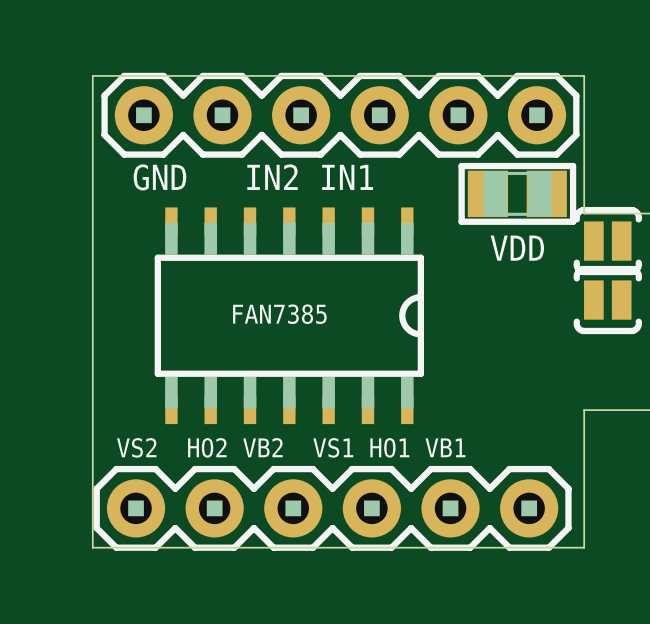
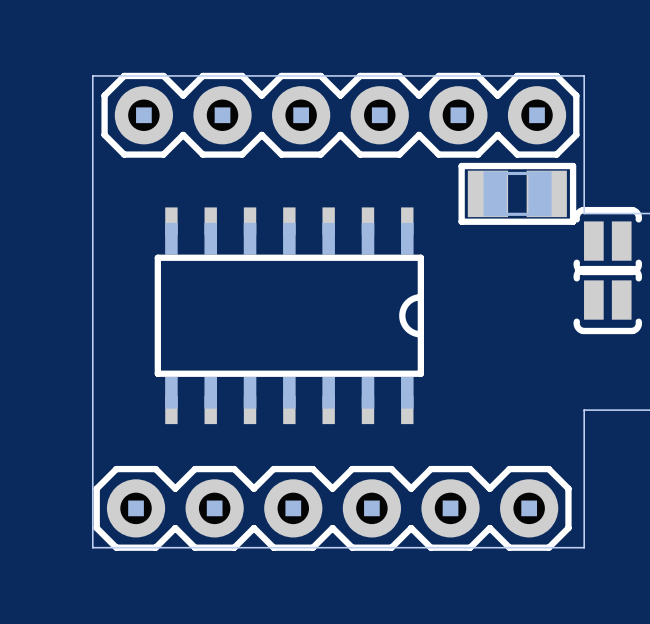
text: GND IN2 IN1 (253, 177) -> none
text: VDD (517, 248) -> none
text: FAN7385 (279, 314) -> none
text: VS2 HO2 VB2 VS1 HO1 VB1 (291, 447) -> none

